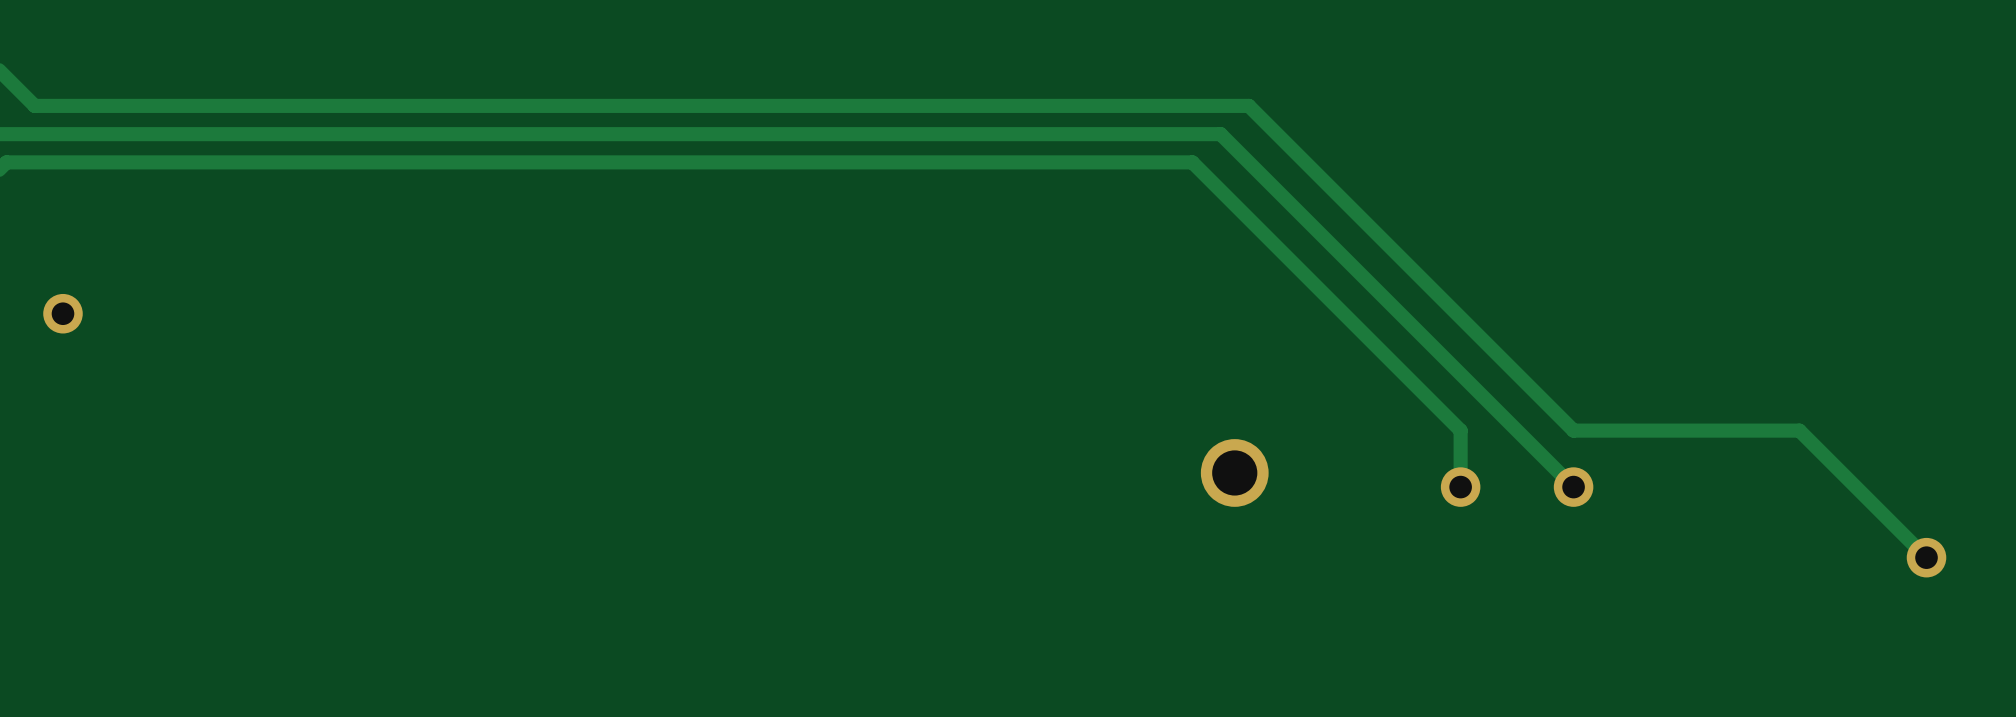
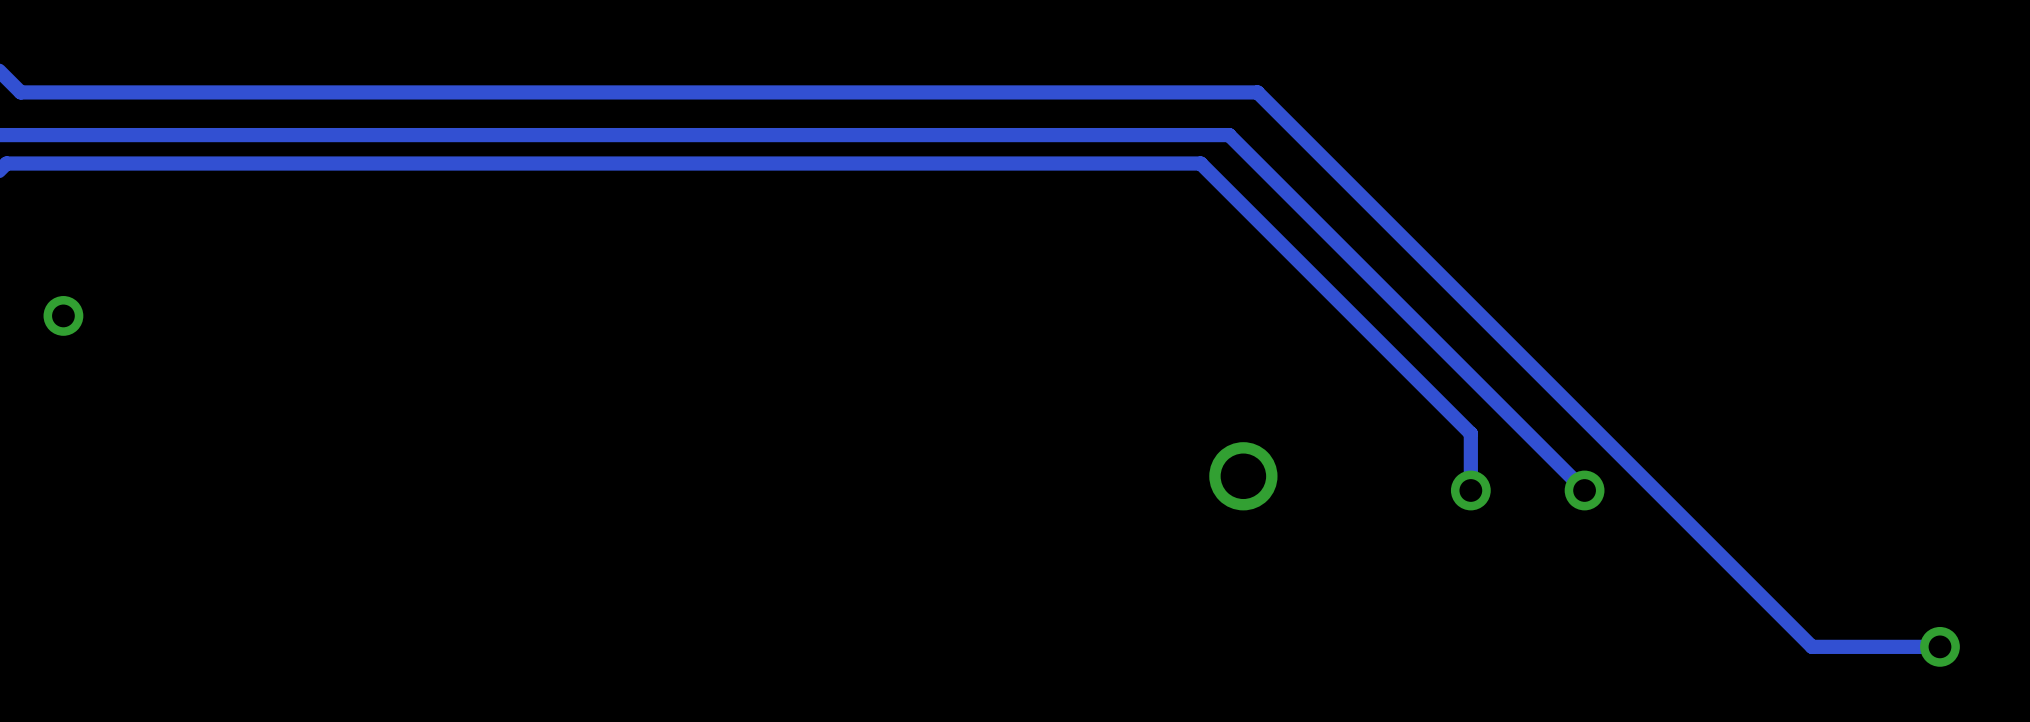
track: (20, 91) (34, 105) (1248, 105) (1573, 430) (1799, 430) (1926, 557) -> (20, 92) (1257, 92) (1812, 646) (1939, 646)
via position: (1926, 557) -> (1939, 646)

